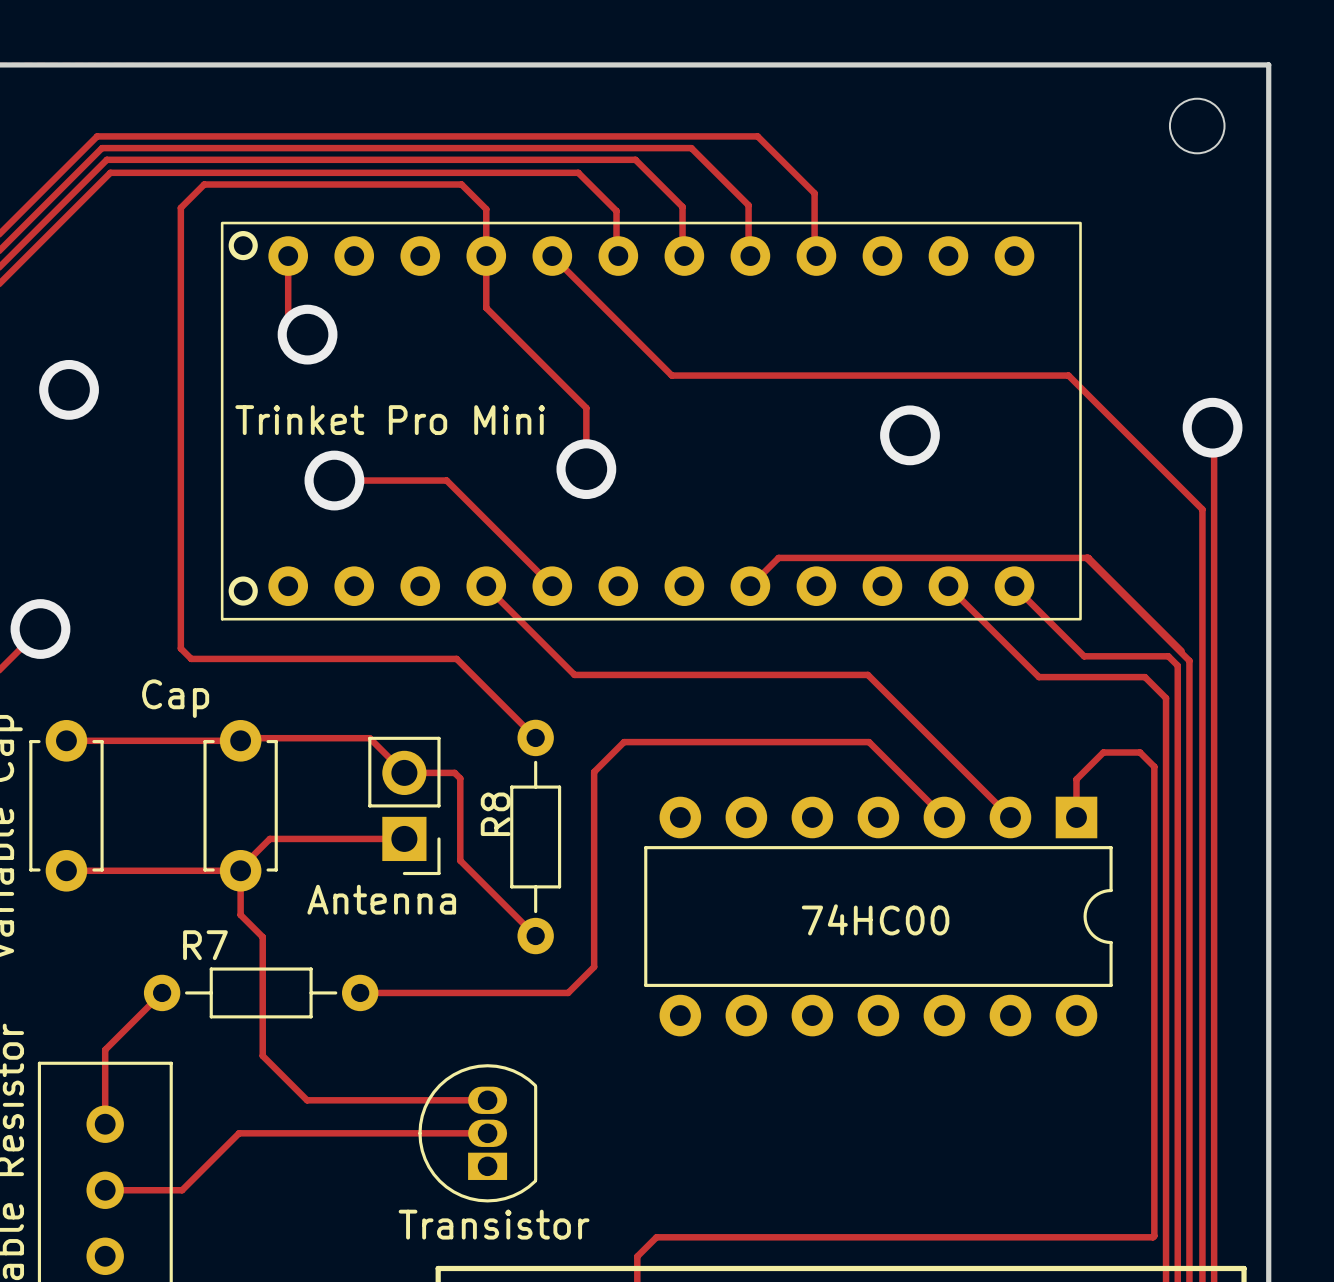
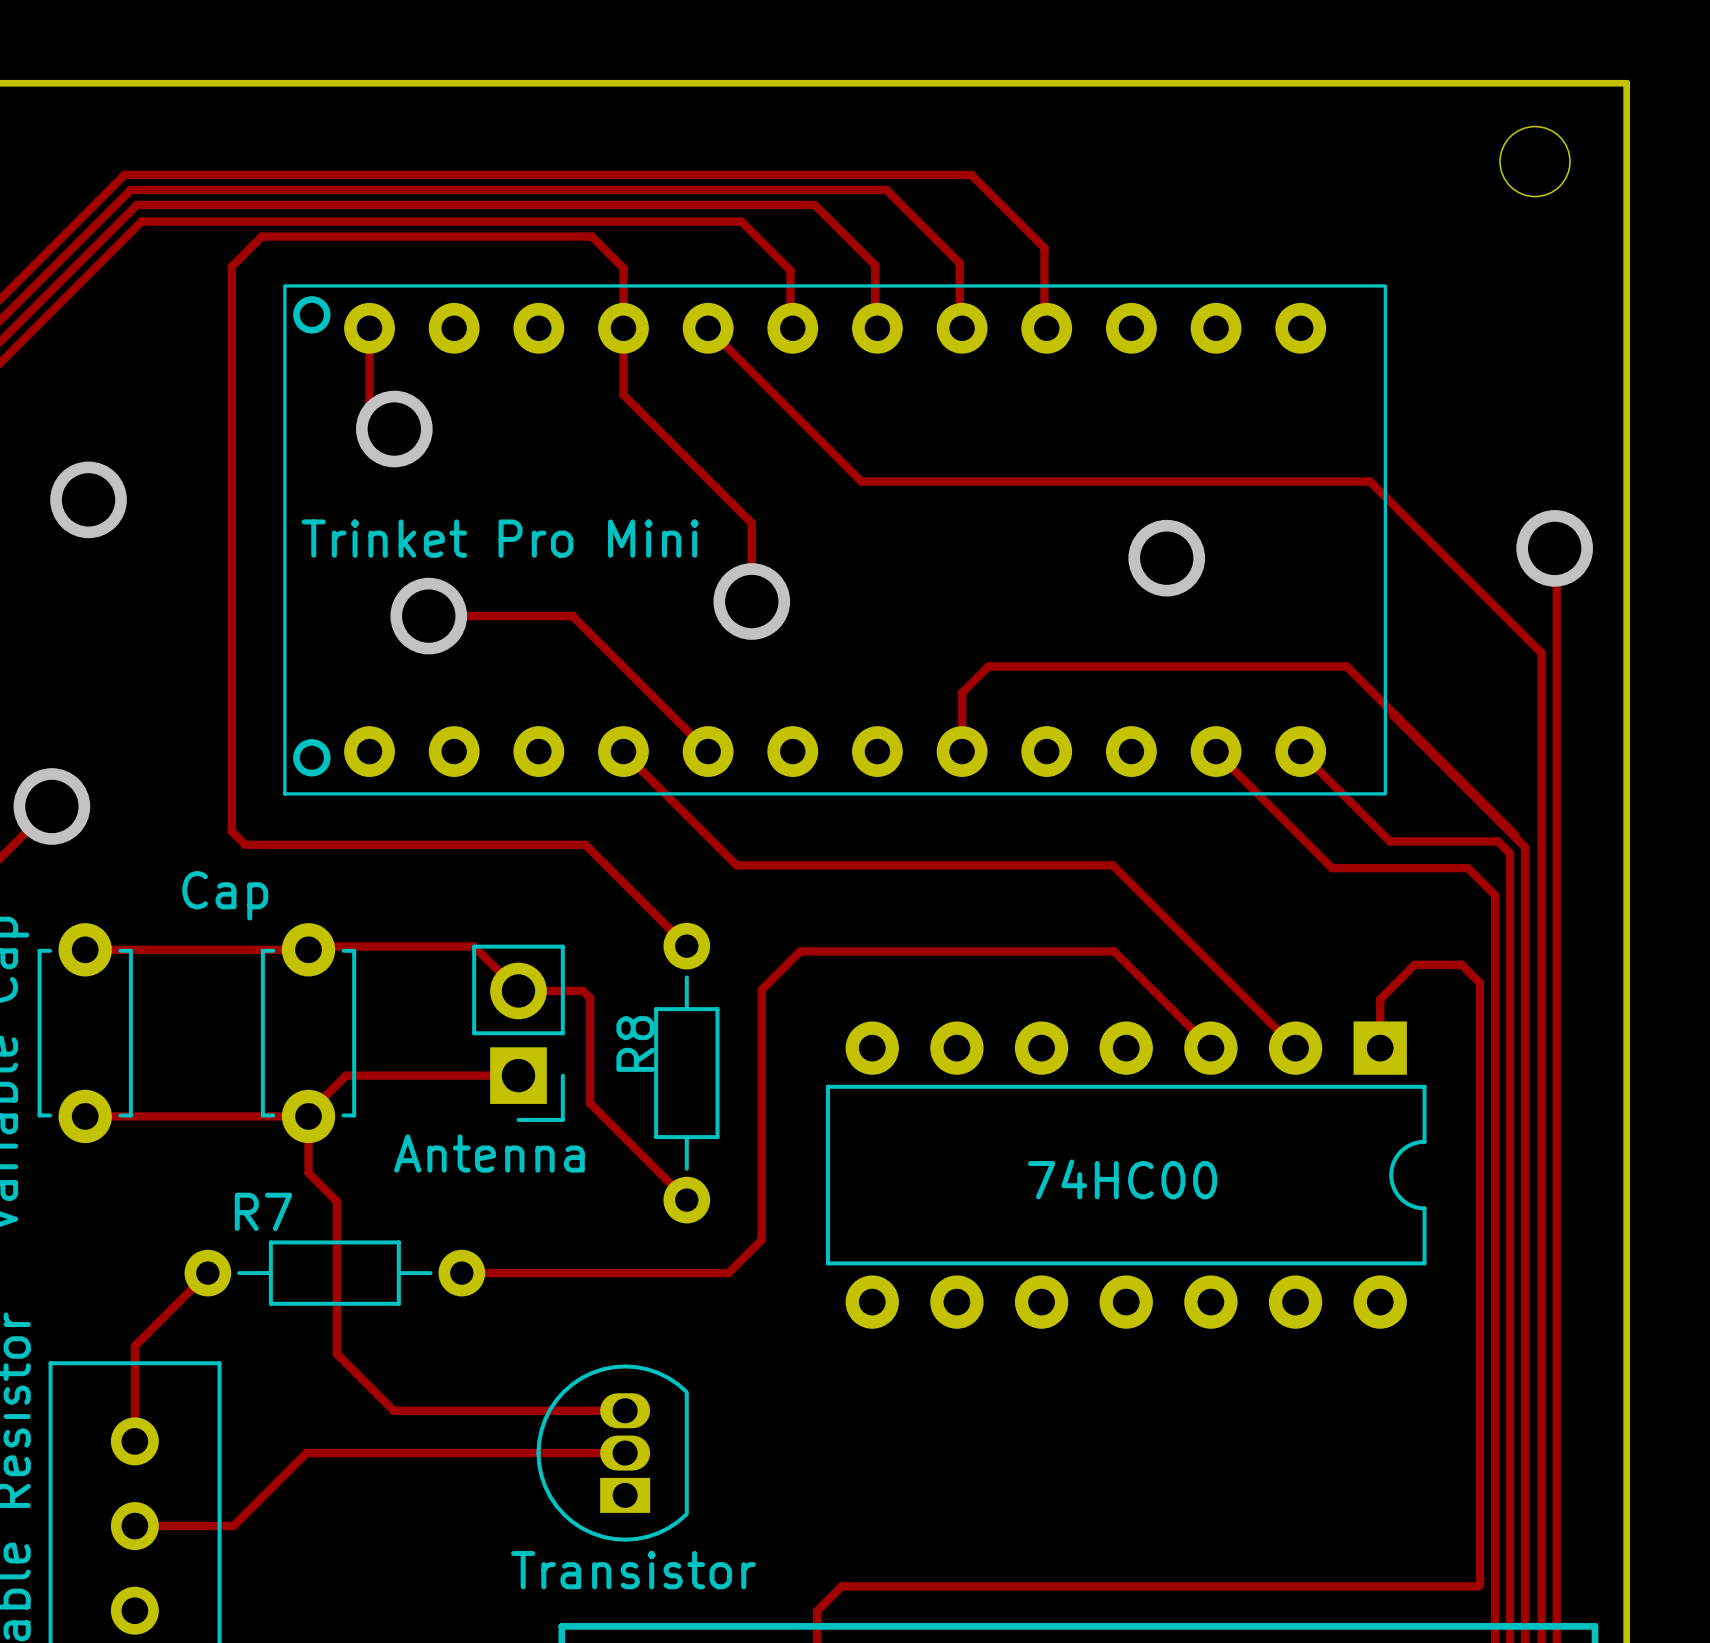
track: (1086, 557) (778, 557) (750, 586) -> (1395, 715) (1346, 666) (988, 666) (962, 692) (962, 751)

